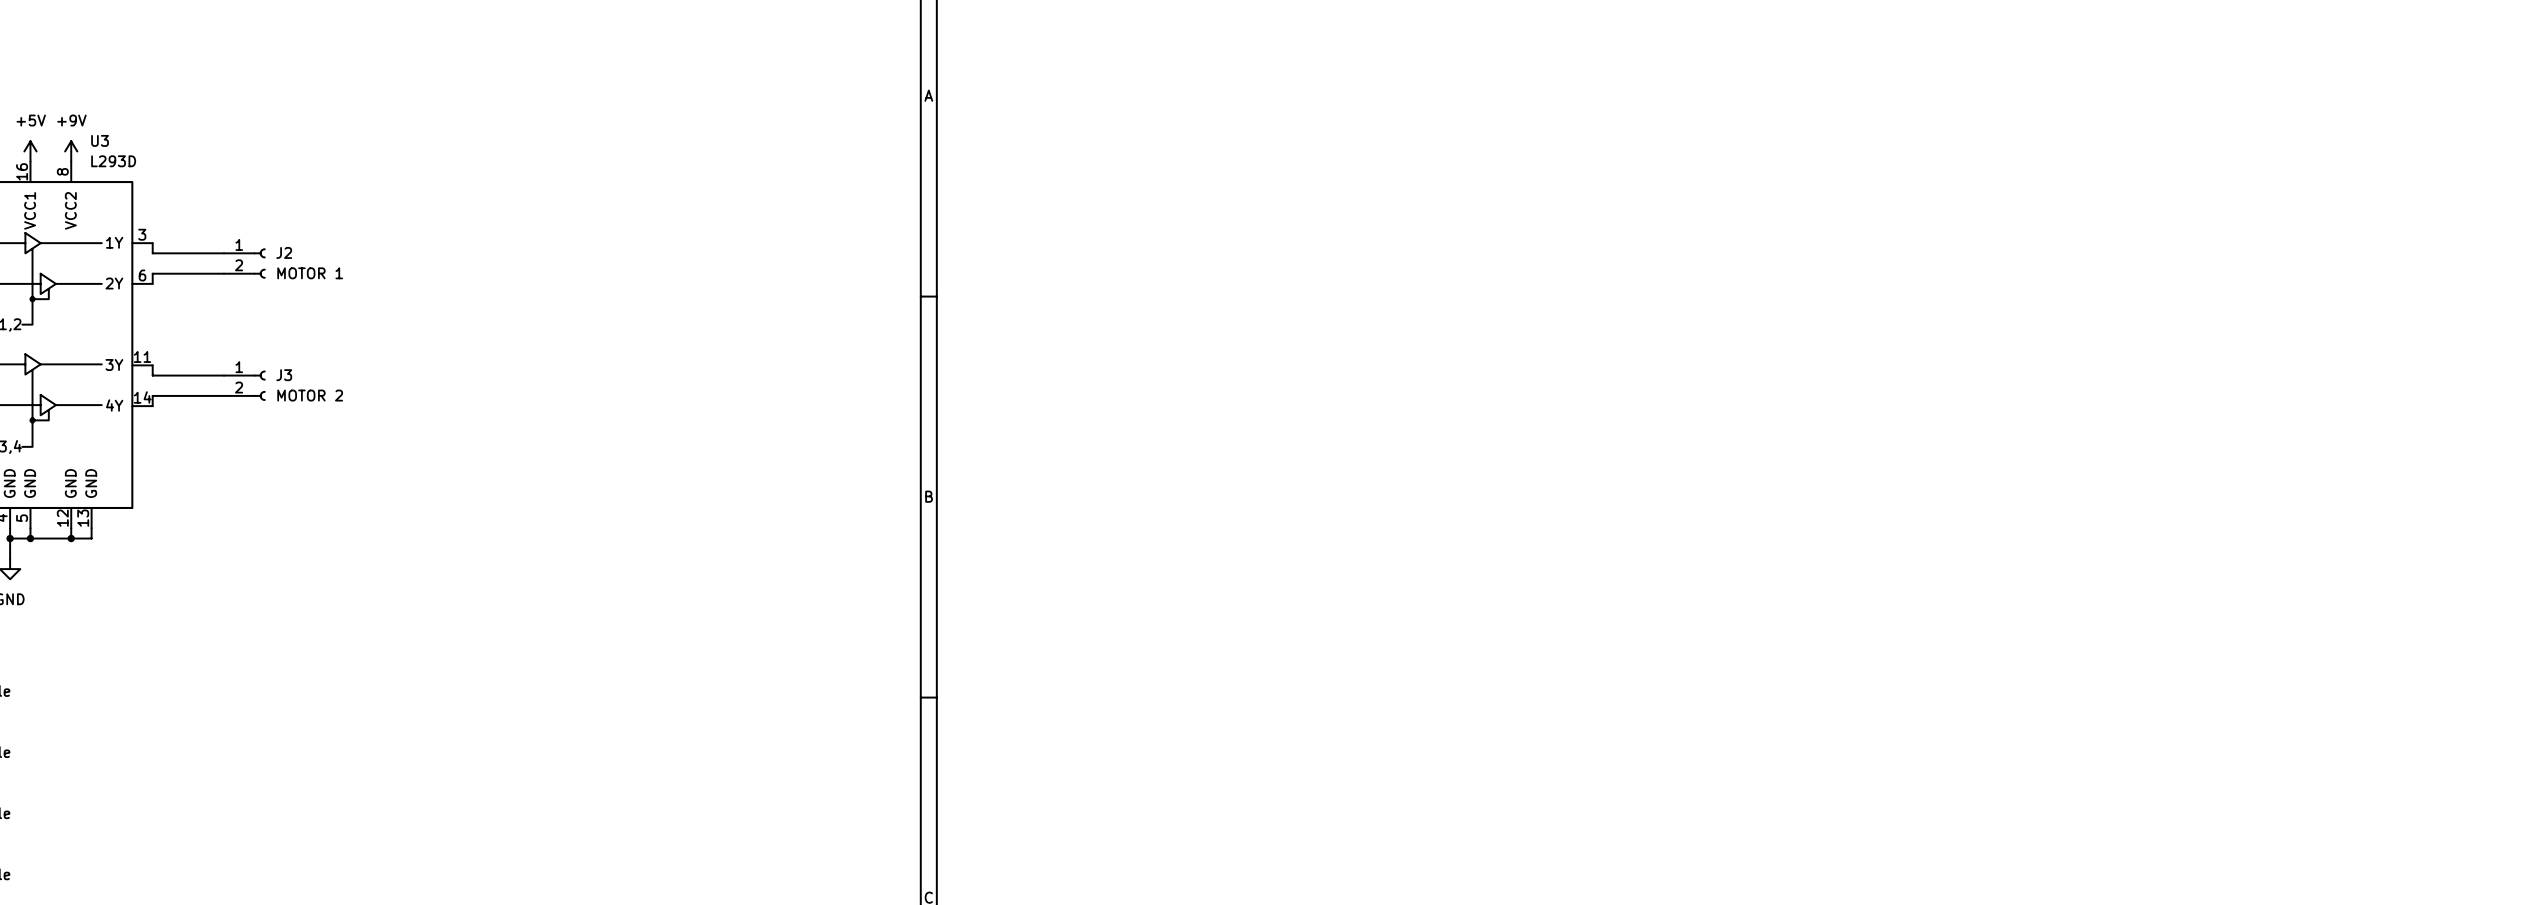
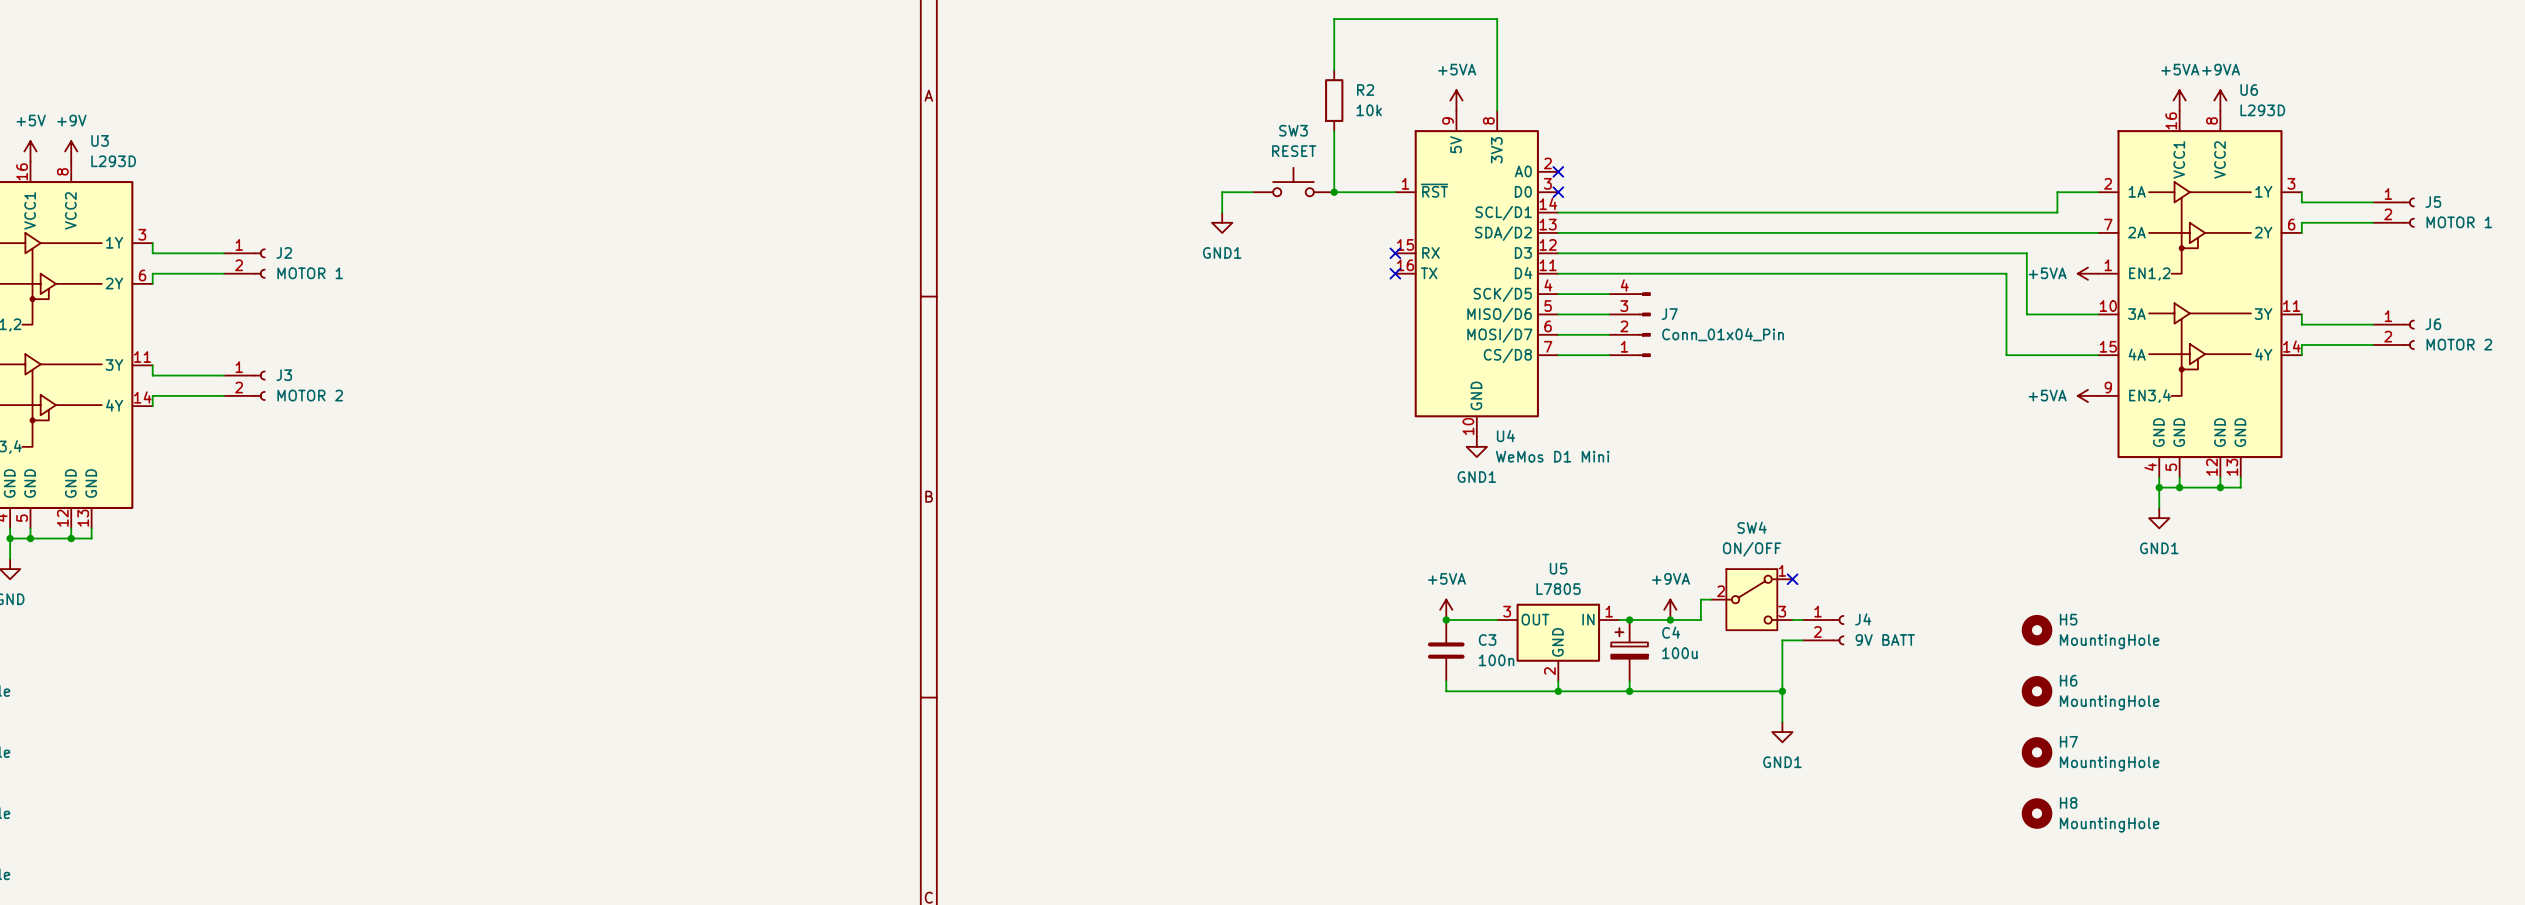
wire: none -> (1334, 70) (1334, 19) (1497, 19) (1497, 110)
R2: none -> 10k (1334, 100)
power symbol: none -> +5VA (1456, 100)
power symbol: none -> +5VA (2179, 100)
power symbol: none -> +9VA (2220, 100)
wire: none -> (1334, 131) (1334, 192) (1395, 192)
no-connect mark: none -> (1558, 171)
SW3: none -> RESET (1293, 182)
wire: none -> (1252, 192) (1222, 192) (1222, 212)
junction: none -> (1334, 192)
no-connect mark: none -> (1558, 192)
wire: none -> (2098, 192) (2057, 192) (2057, 212) (1558, 212)
wire: none -> (2301, 192) (2301, 202) (2373, 202)
J5: none -> MOTOR 1 (2393, 212)
power symbol: none -> GND1 (1222, 222)
wire: none -> (2373, 222) (2301, 222) (2301, 232)
wire: none -> (1558, 232) (2098, 232)
no-connect mark: none -> (1395, 253)
wire: none -> (1558, 253) (2026, 253) (2026, 314) (2098, 314)
no-connect mark: none -> (1395, 273)
U4: none -> WeMos D1 Mini (1476, 273)
wire: none -> (1558, 273) (2006, 273) (2006, 355) (2098, 355)
power symbol: none -> +5VA (2087, 273)
wire: none -> (1558, 294) (1609, 294)
U6: none -> L293D (2200, 294)
wire: none -> (1558, 314) (1609, 314)
wire: none -> (2301, 314) (2301, 324) (2373, 324)
J7: none -> Conn_01x04_Pin (1629, 324)
wire: none -> (1558, 334) (1609, 334)
J6: none -> MOTOR 2 (2393, 334)
wire: none -> (2373, 345) (2301, 345) (2301, 355)
wire: none -> (1558, 355) (1609, 355)
power symbol: none -> +5VA (2087, 395)
power symbol: none -> GND1 (1476, 446)
wire: none -> (2159, 477) (2159, 507)
wire: none -> (2179, 477) (2179, 487)
wire: none -> (2220, 477) (2220, 487)
wire: none -> (2240, 477) (2240, 487) (2159, 487)
junction: none -> (2159, 487)
junction: none -> (2179, 487)
junction: none -> (2220, 487)
power symbol: none -> GND1 (2159, 518)
no-connect mark: none -> (1792, 579)
wire: none -> (1711, 599) (1700, 599) (1700, 620) (1619, 620)
SW4: none -> ON/OFF (1751, 599)
power symbol: none -> +5VA (1446, 609)
power symbol: none -> +9VA (1670, 609)
wire: none -> (1446, 620) (1497, 620)
junction: none -> (1446, 620)
junction: none -> (1629, 620)
junction: none -> (1670, 620)
wire: none -> (1792, 620) (1802, 620)
J4: none -> 9V BATT (1823, 630)
H5: none -> MountingHole (2037, 630)
wire: none -> (1802, 640) (1782, 640) (1782, 721)
U5: none -> L7805 (1558, 642)
C3: none -> 100n (1446, 650)
C4: none -> 100u (1629, 650)
wire: none -> (1446, 681) (1446, 691) (1782, 691)
wire: none -> (1558, 681) (1558, 691)
wire: none -> (1629, 681) (1629, 691)
junction: none -> (1558, 691)
junction: none -> (1629, 691)
junction: none -> (1782, 691)
H6: none -> MountingHole (2037, 691)
power symbol: none -> GND1 (1782, 732)
H7: none -> MountingHole (2037, 752)
H8: none -> MountingHole (2037, 813)

